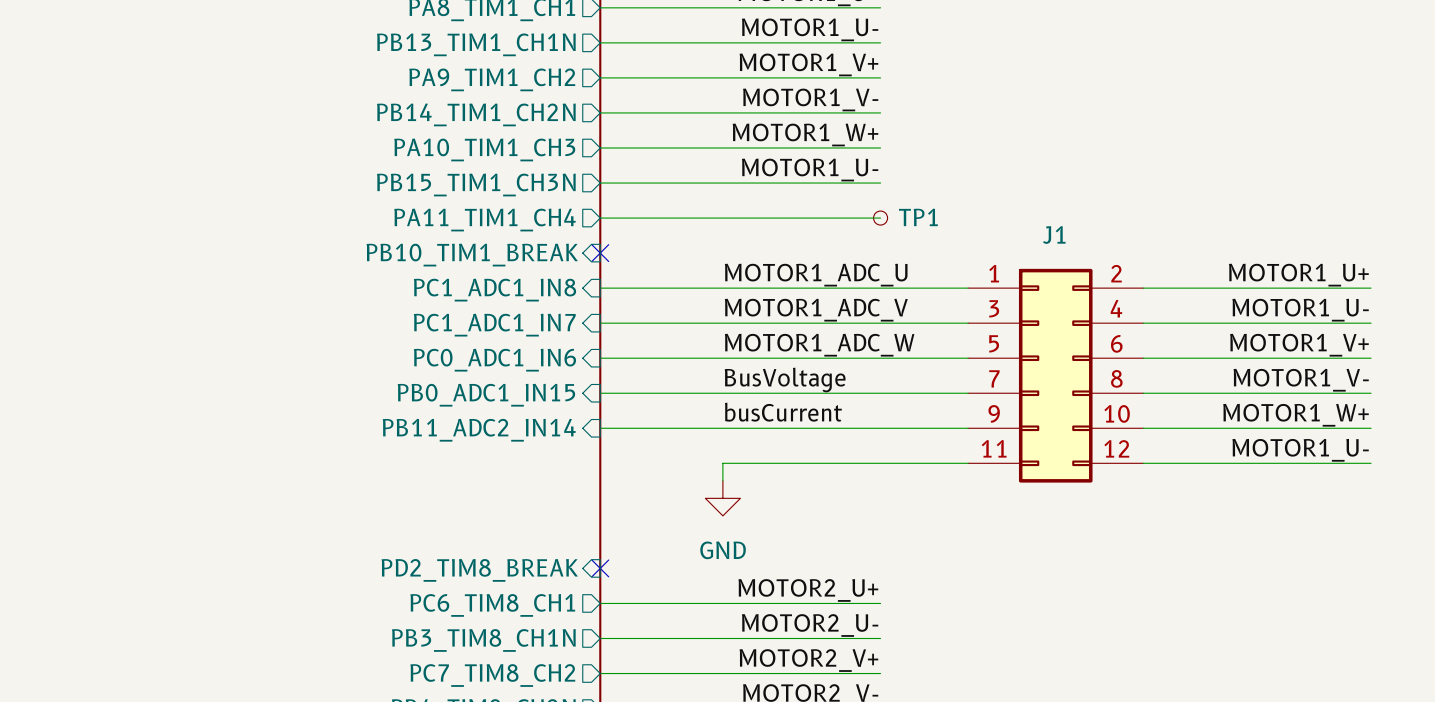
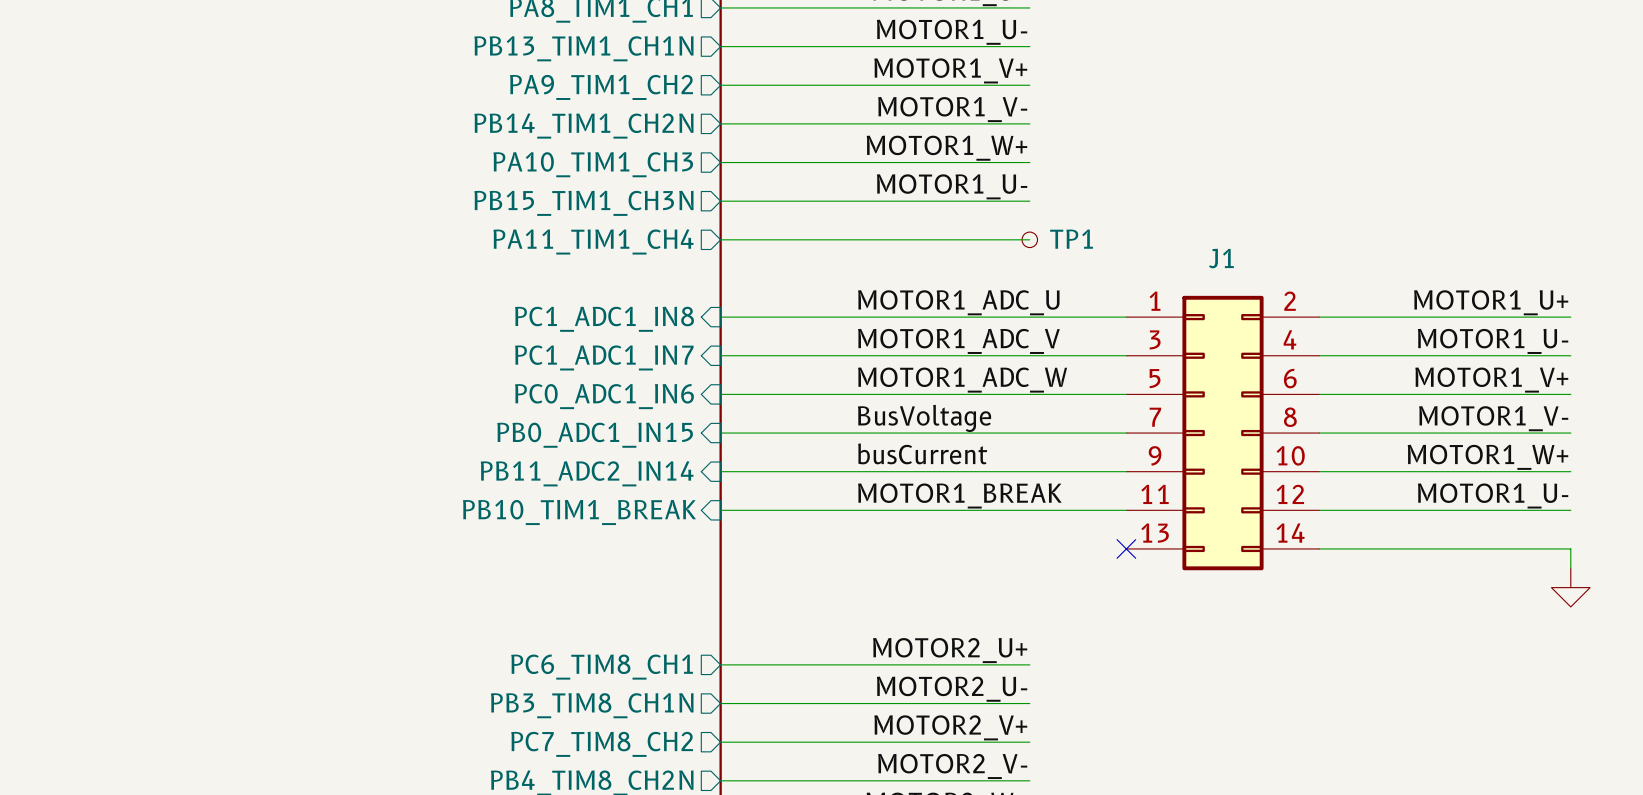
no-connect mark: (600, 253) -> none
sheet pin position: PB10_TIM1_BREAK (472, 255) -> PB10_TIM1_BREAK (579, 512)
J1 symbol: [968, 268, 1144, 483] -> [1126, 295, 1320, 571]
label: none -> MOTOR1_BREAK (959, 495)
wire: (722, 463) (722, 480) -> (855, 510) (720, 510)
power symbol: GND (722, 498) -> none
no-connect mark: none -> (1126, 548)
wire: none -> (1319, 548) (1570, 548) (1570, 568)
power symbol: none -> (1570, 587)
no-connect mark: (600, 568) -> none
sheet pin: PD2_TIM8_BREAK (479, 570) -> none

